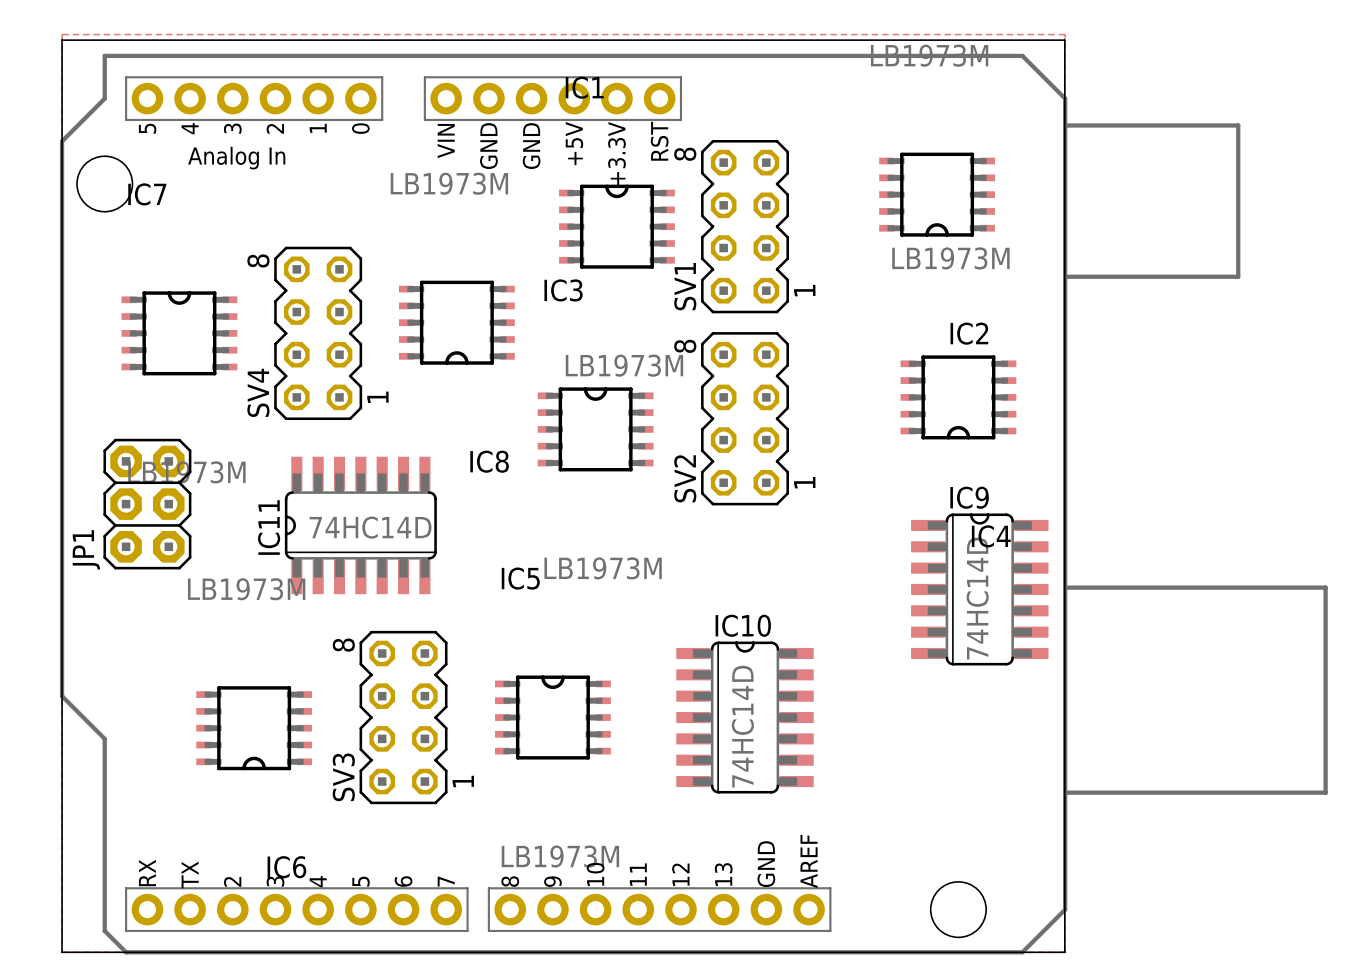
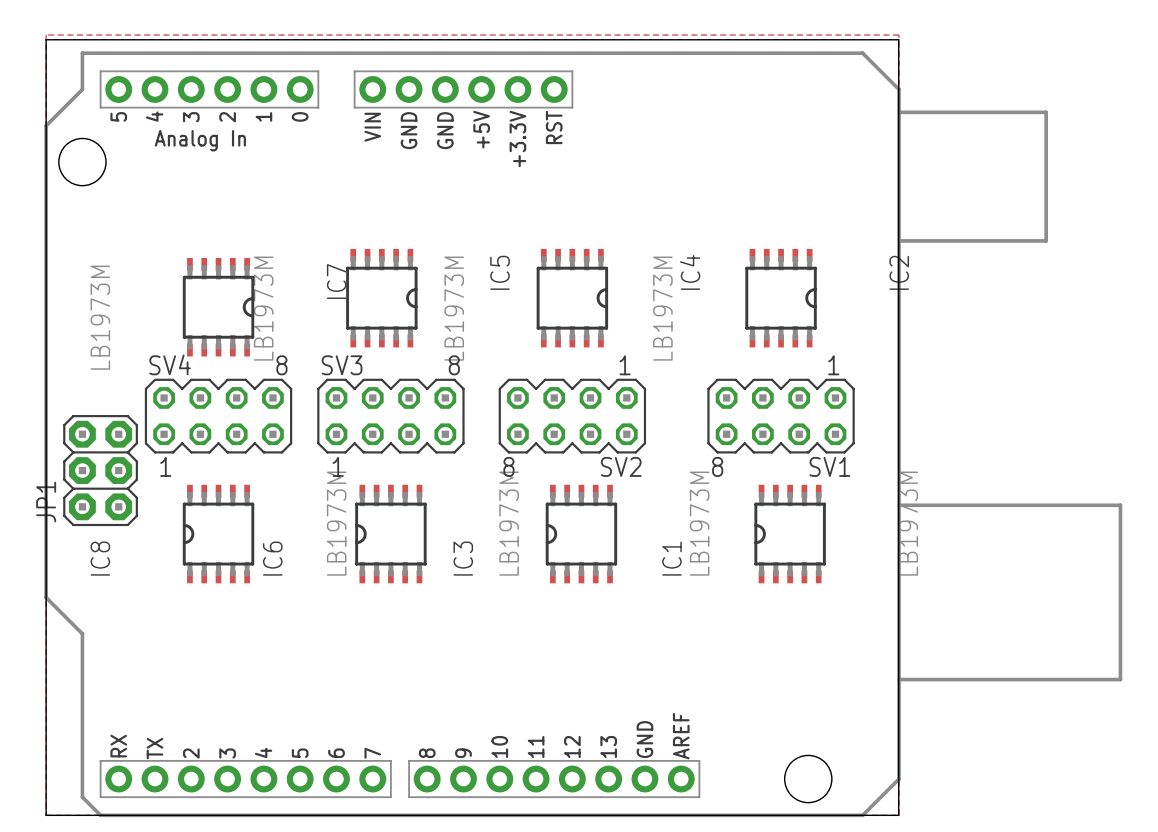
SV1 footprint: [701, 140, 789, 314] -> [707, 378, 855, 454]
IC2 rotation: 0° (937, 194) -> 90° counterclockwise (781, 298)
IC2 position: (937, 194) -> (781, 298)
IC1 rotation: 0° (616, 226) -> 90° counterclockwise (790, 534)
IC1 position: (616, 226) -> (790, 534)
SV1 name position: SV1 (685, 286) -> SV1 (829, 466)
IC8 rotation: 0° (456, 322) -> 90° clockwise (218, 534)
IC8 position: (456, 322) -> (218, 534)
SV2 footprint: [701, 332, 789, 506] -> [498, 378, 647, 454]
IC7 rotation: 0° (179, 333) -> 90° clockwise (218, 307)
IC7 position: (179, 333) -> (218, 307)
SV4 rotation: 0° (318, 333) -> 90° clockwise (218, 416)
SV4 position: (318, 333) -> (218, 416)
IC4 rotation: 0° (958, 397) -> 90° counterclockwise (572, 298)
IC4 position: (958, 397) -> (572, 298)
IC3 rotation: 0° (595, 429) -> 90° counterclockwise (581, 534)
IC3 position: (595, 429) -> (581, 534)
SV2 name position: SV2 (685, 478) -> SV2 (621, 466)
JP1 position: (147, 504) -> (100, 470)
IC11: 74HC14D (360, 525) -> none
IC9: 74HC14D (979, 589) -> none
SV3 rotation: 0° (403, 717) -> 90° clockwise (390, 416)
SV3 position: (403, 717) -> (390, 416)
IC5 rotation: 0° (552, 717) -> 90° clockwise (381, 298)
IC5 position: (552, 717) -> (381, 298)
IC10: 74HC14D (745, 717) -> none
IC6 rotation: 0° (254, 728) -> 90° clockwise (390, 534)
IC6 position: (254, 728) -> (390, 534)

